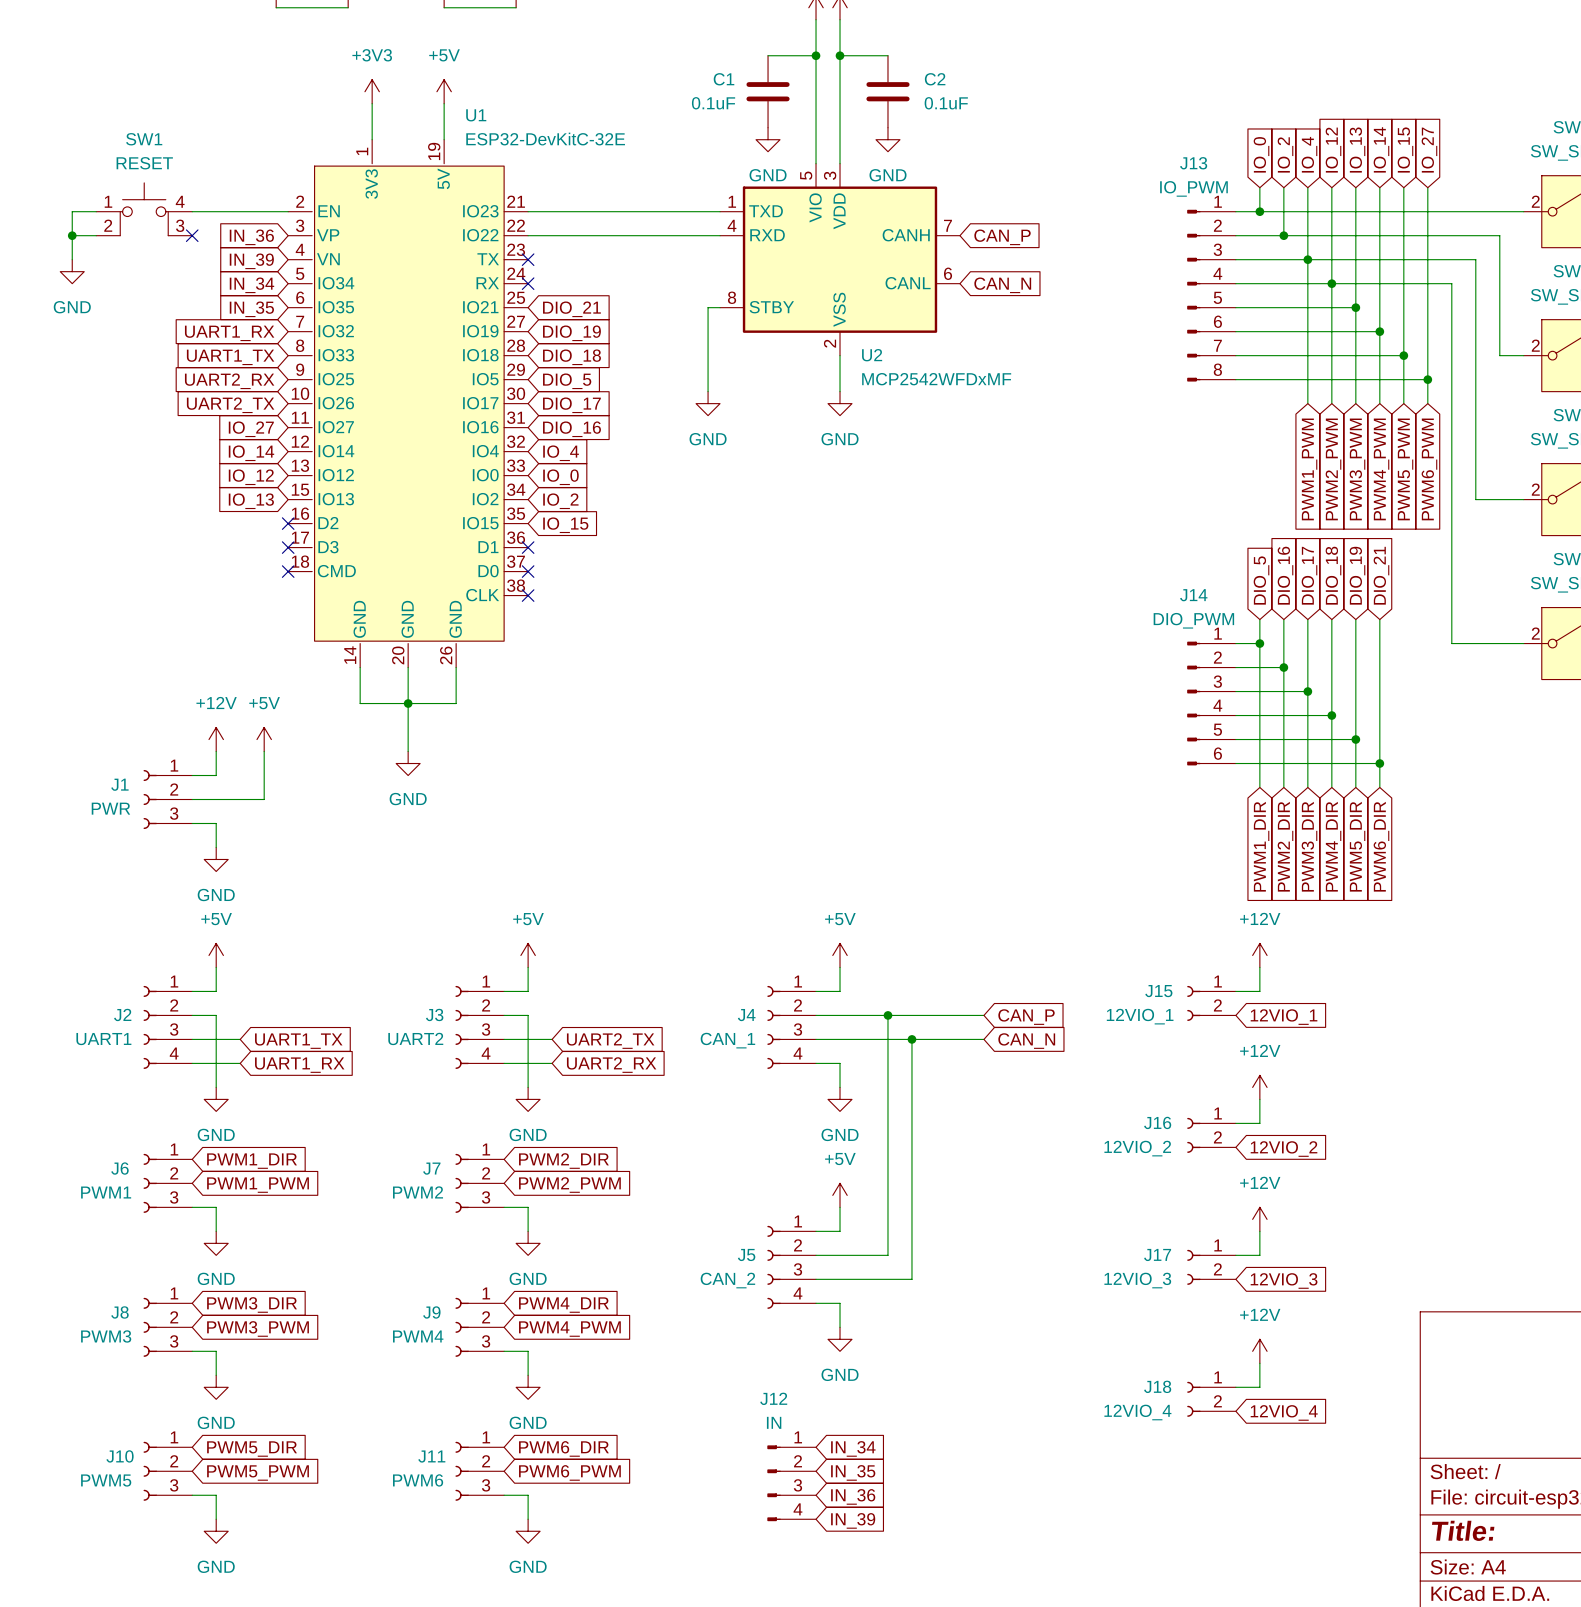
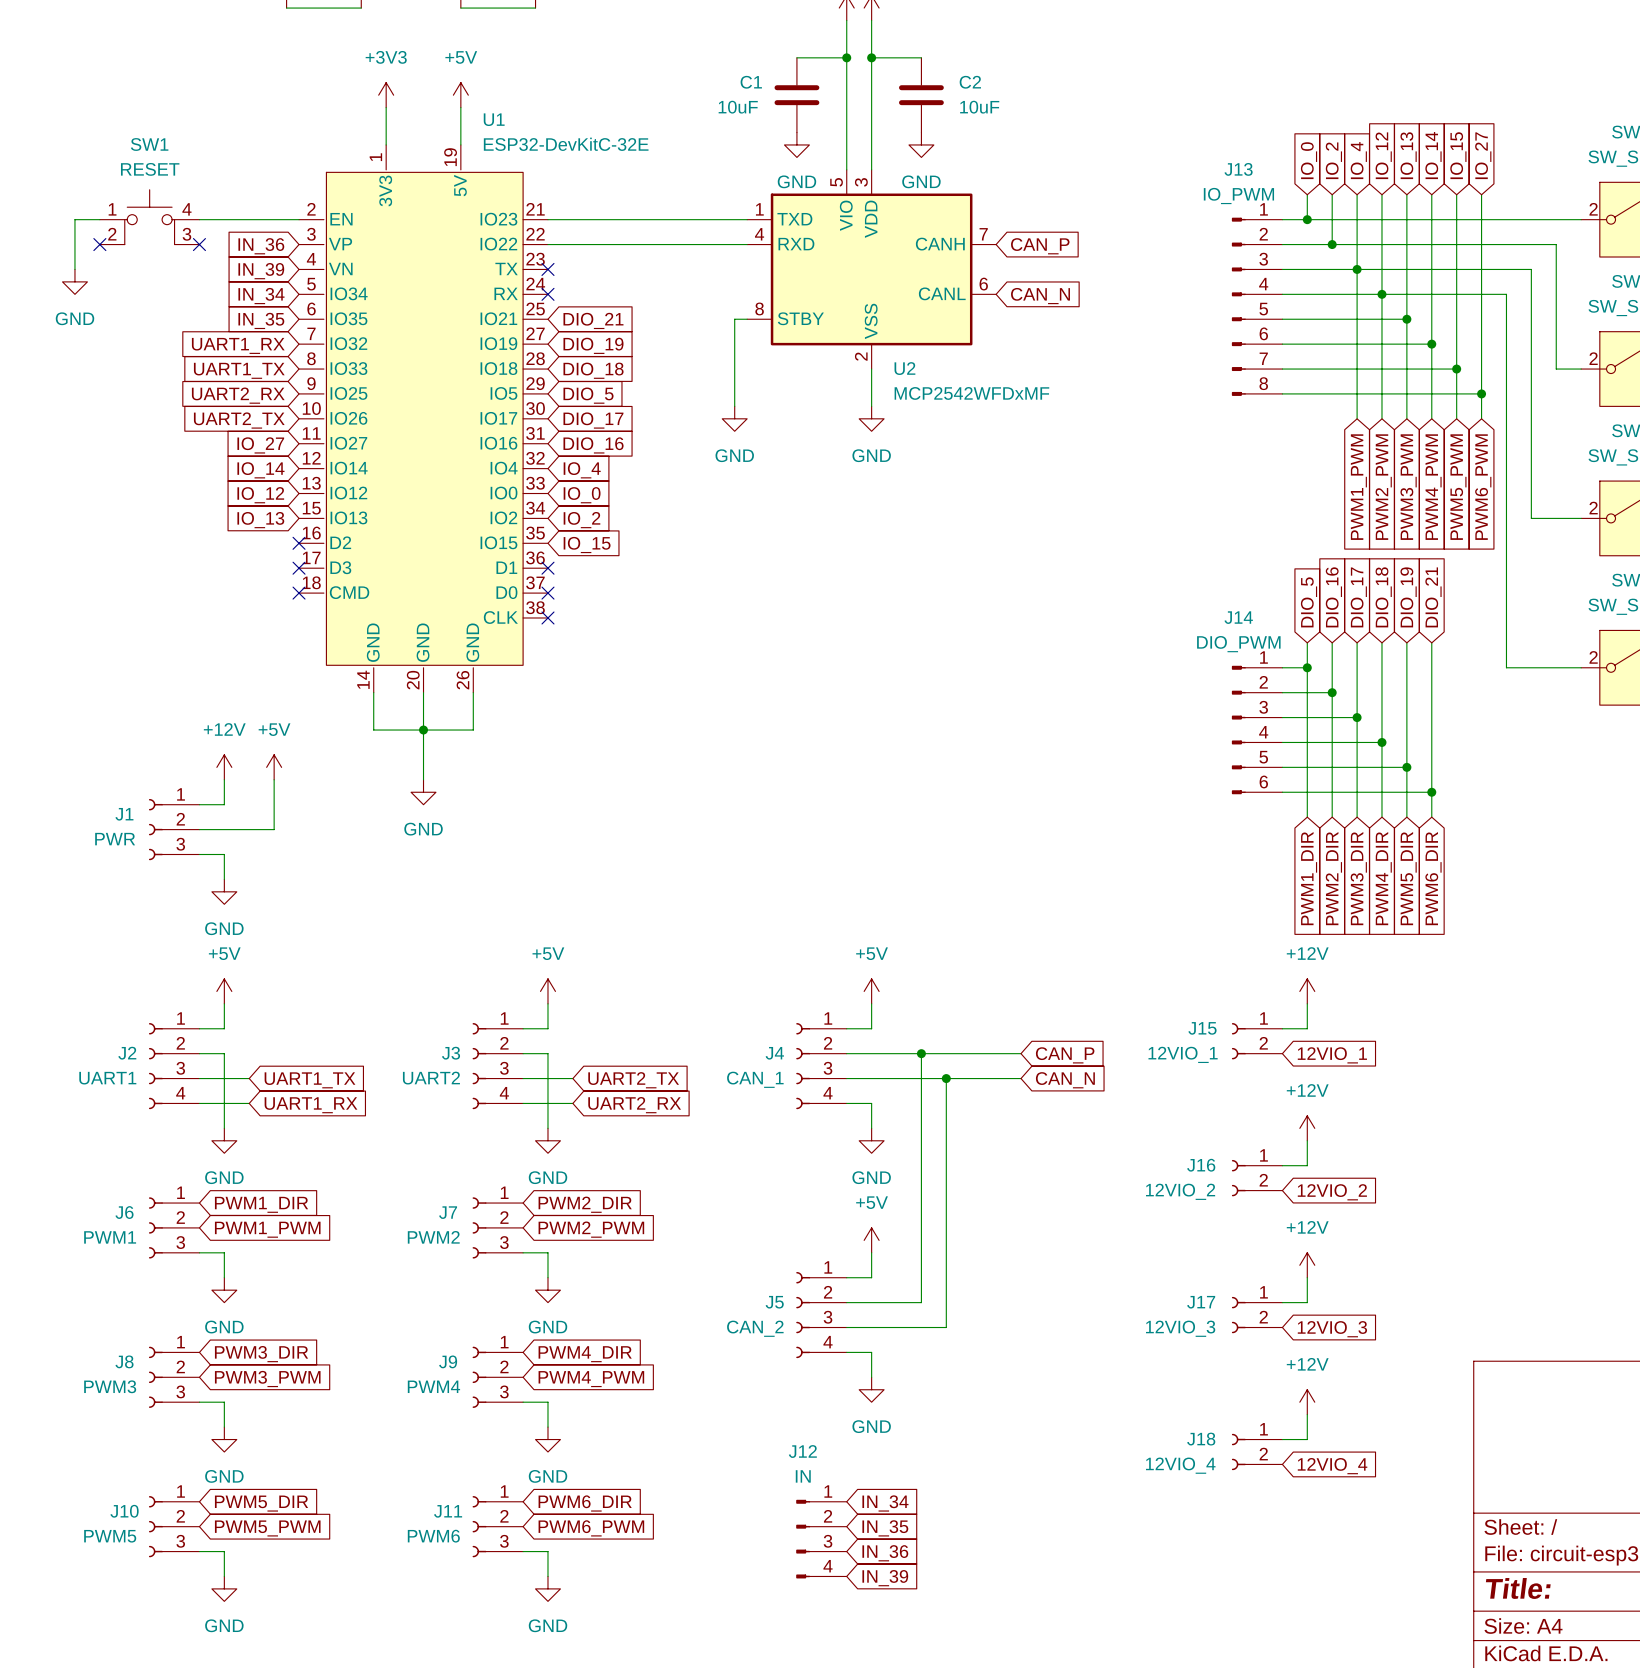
C1 value: 0.1uF (713, 103) -> 10uF (738, 107)
C2 value: 0.1uF (946, 103) -> 10uF (979, 107)
wire: (72, 235) (96, 235) -> none
junction: (72, 235) -> none
no-connect mark: none -> (99, 244)

